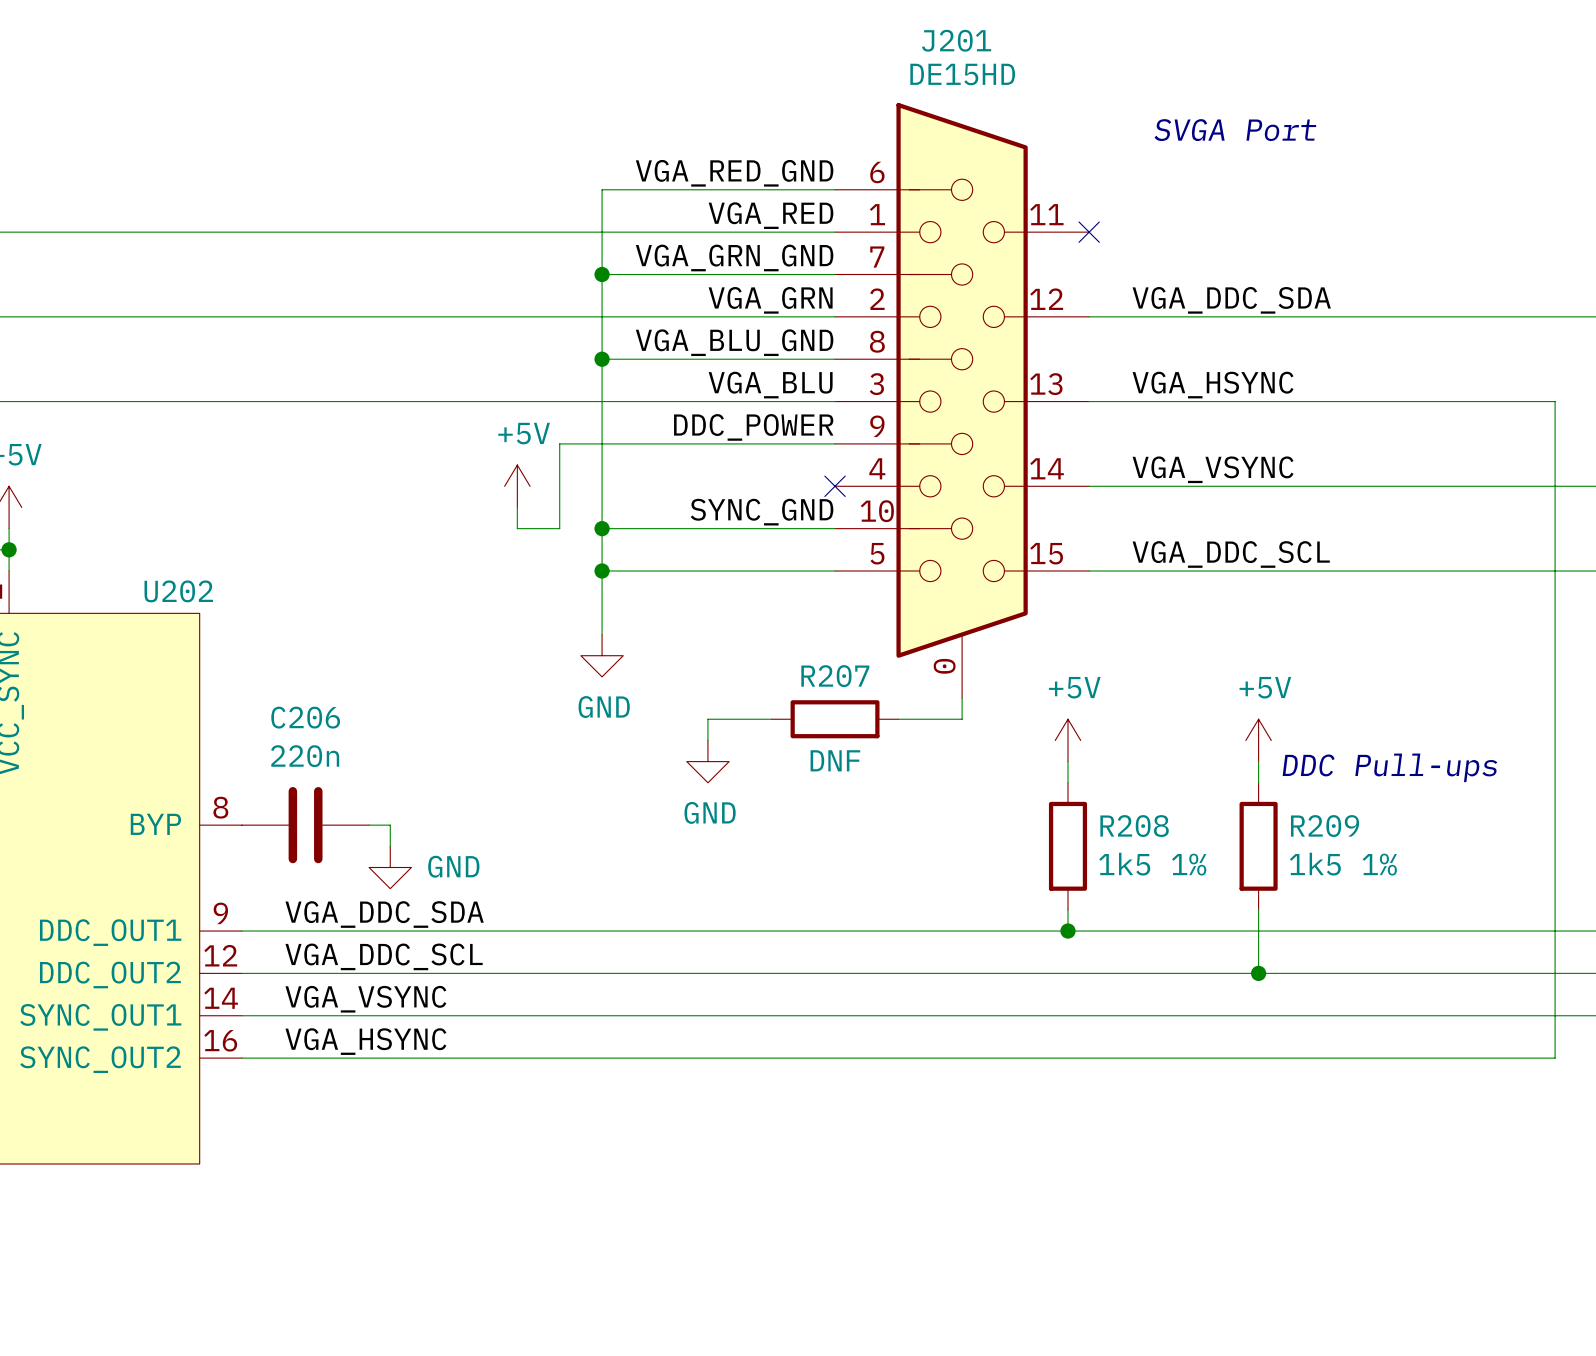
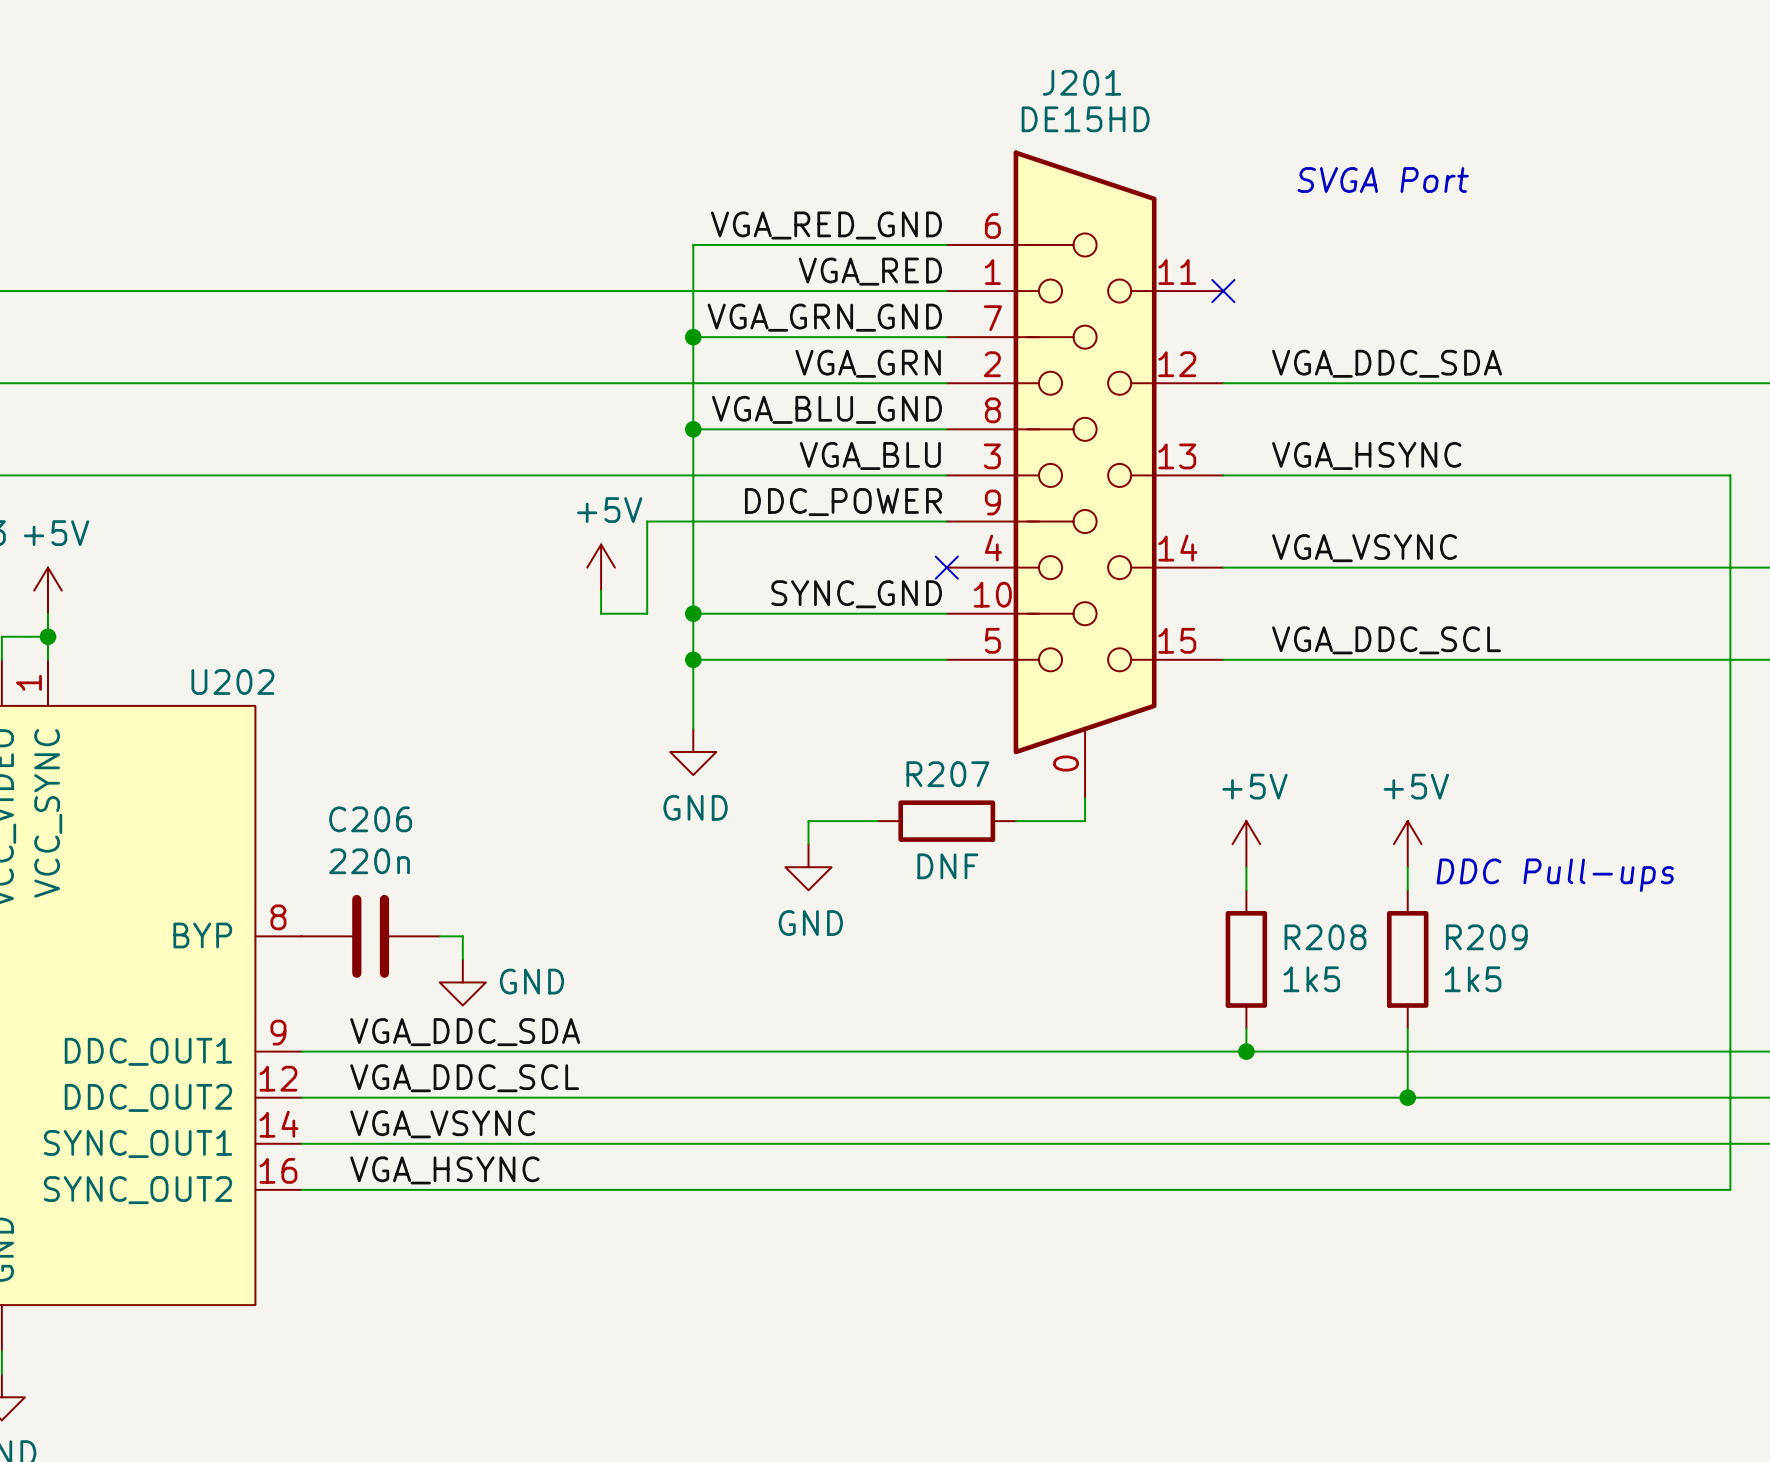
power symbol position: +5V (1067, 740) -> +5V (1246, 844)
wire: (1067, 761) (1067, 782) -> (1246, 867) (1246, 890)
R208 position: (1067, 846) -> (1246, 959)
R208 value: 1k5 1% (1152, 864) -> 1k5 (1311, 979)
R209 value: 1k5 1% (1343, 864) -> 1k5 (1473, 979)
wire: (1067, 909) (1067, 931) -> (1246, 1028) (1246, 1051)
junction position: (1067, 931) -> (1246, 1051)

